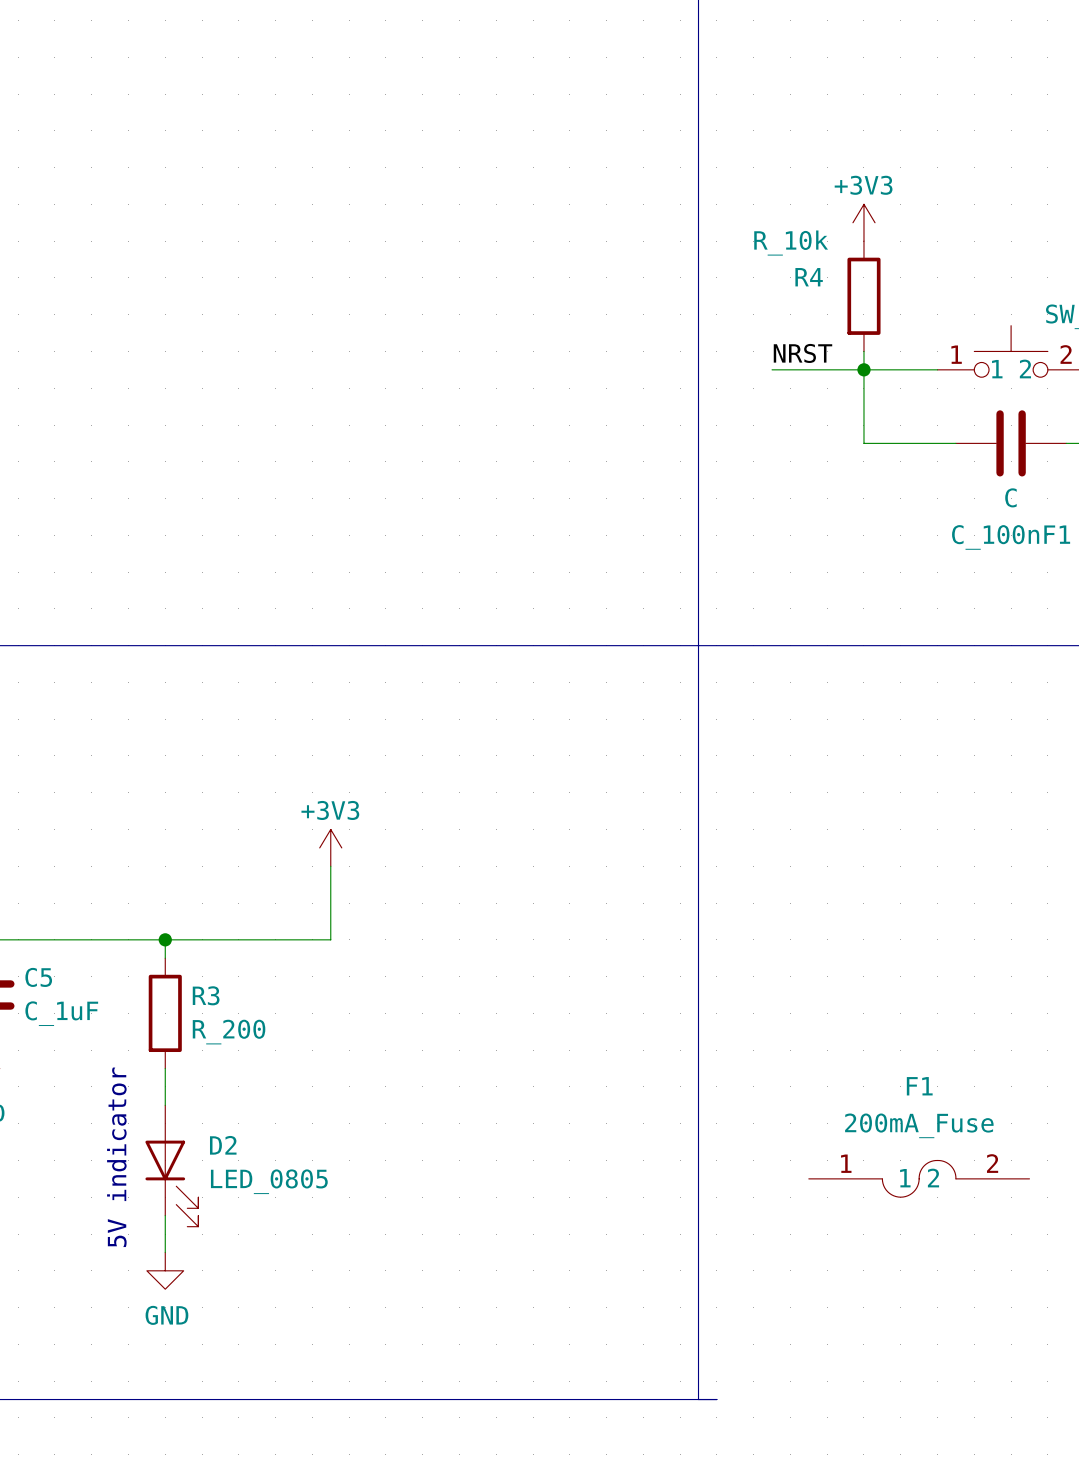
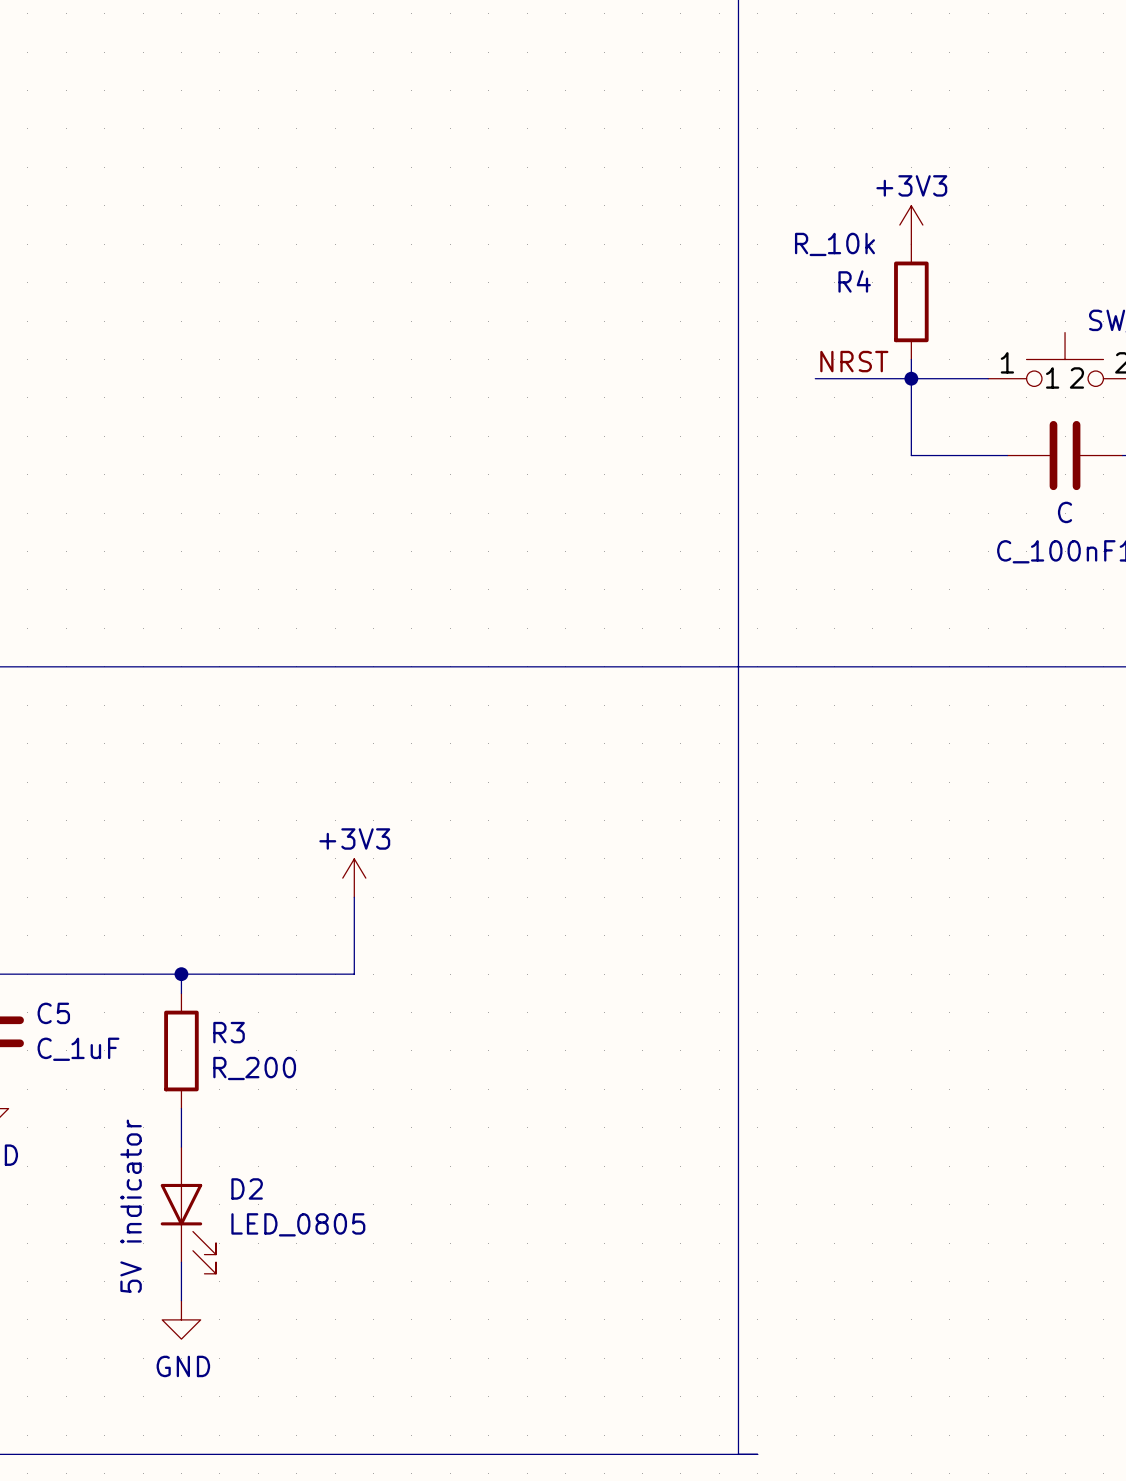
F1: 200mA_Fuse (919, 1178) -> none

